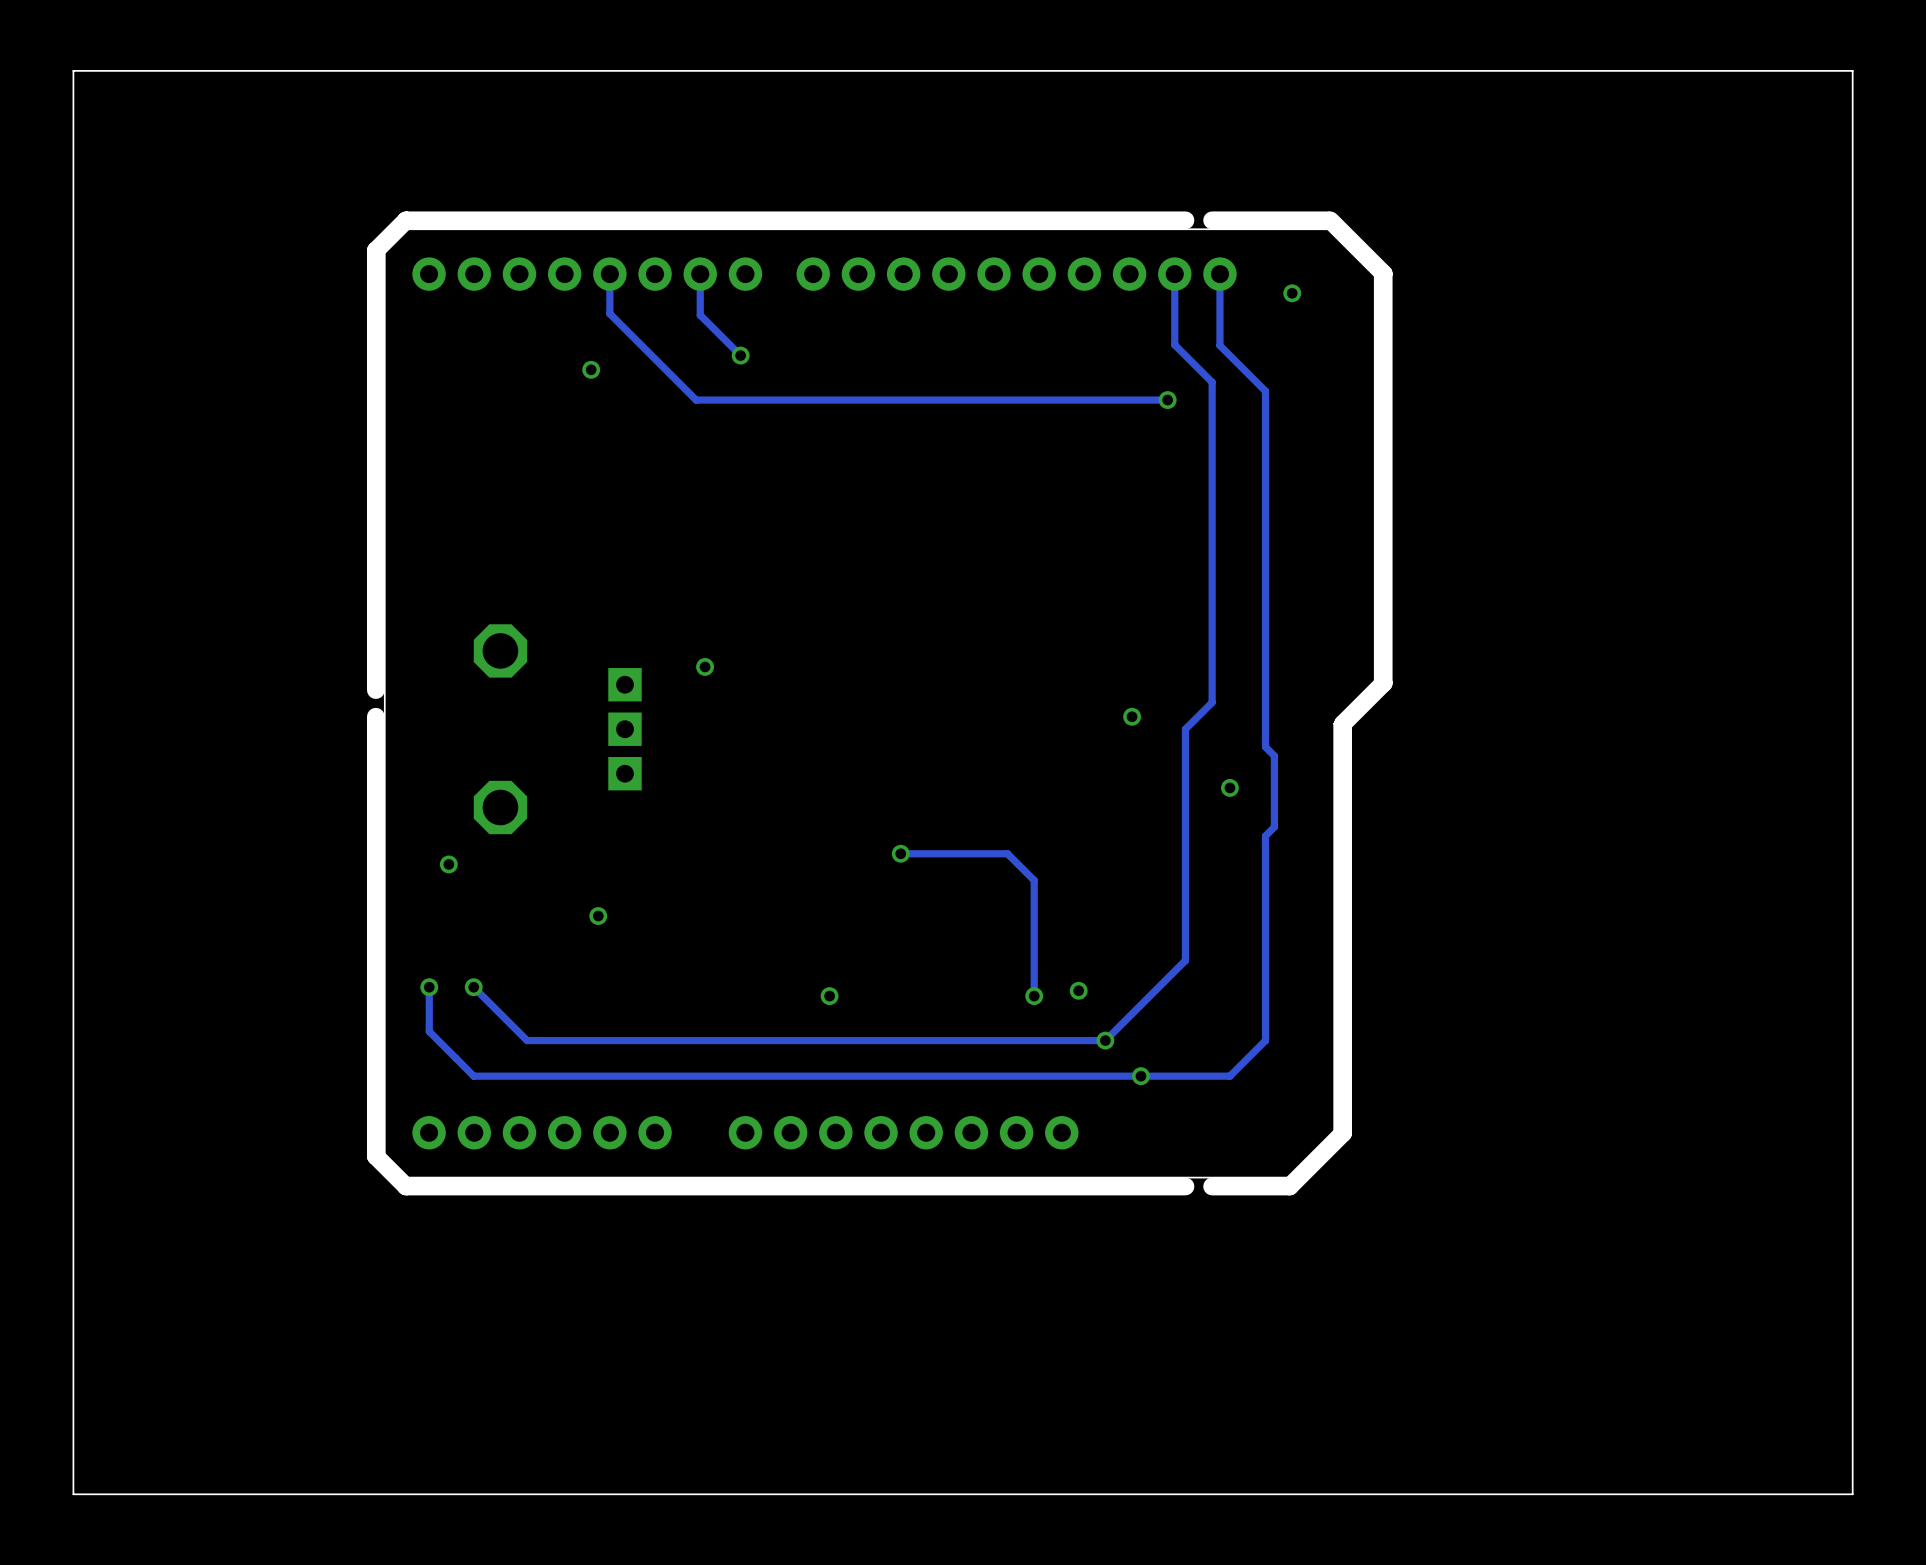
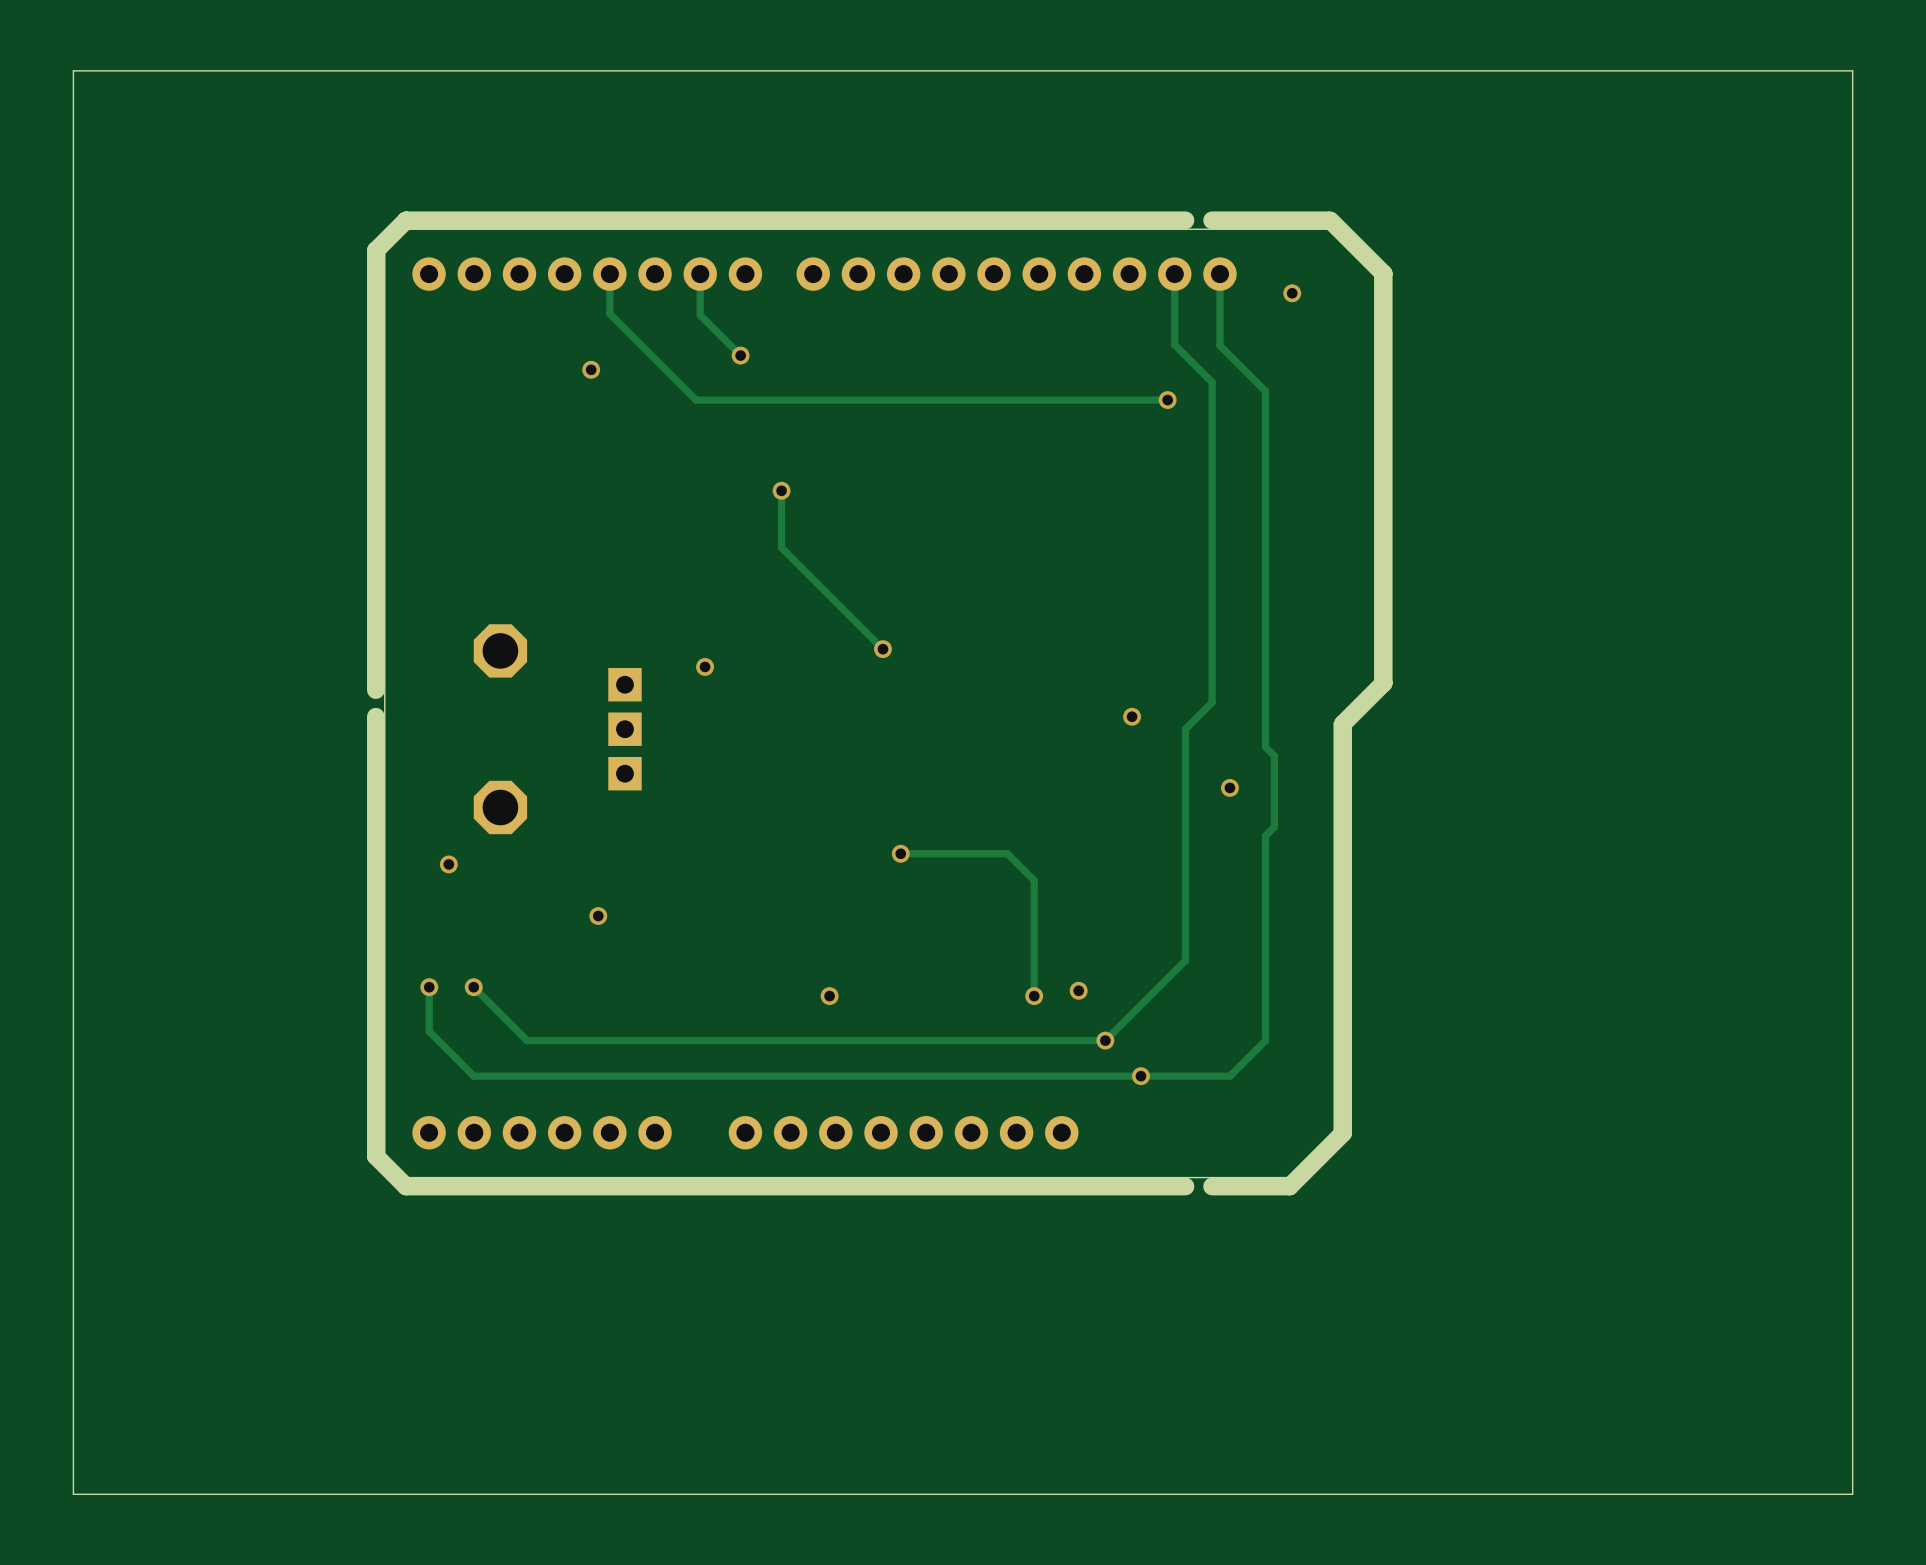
track: none -> (781, 490) (781, 547) (882, 649)
via: none -> (781, 490)
via: none -> (882, 649)

